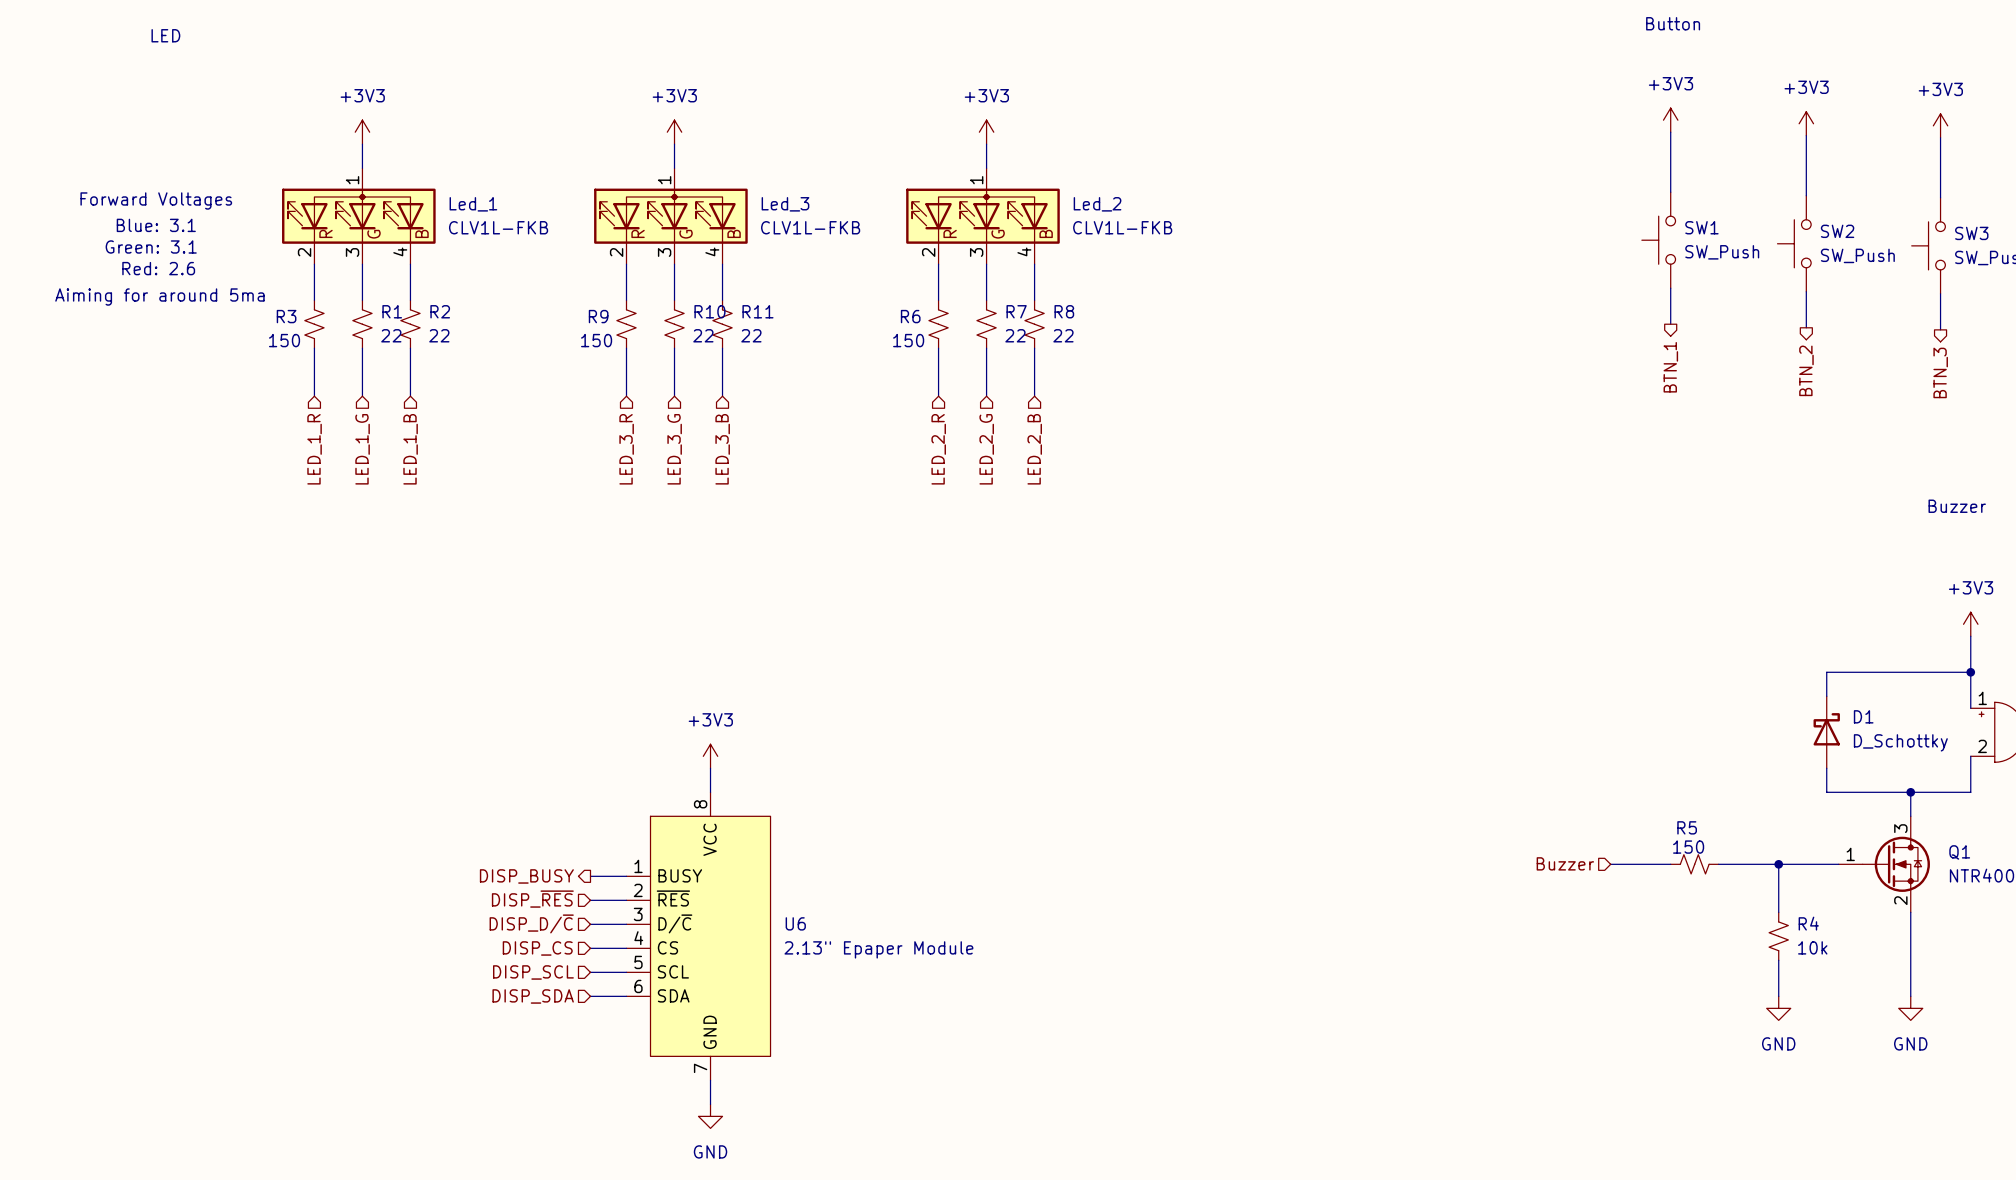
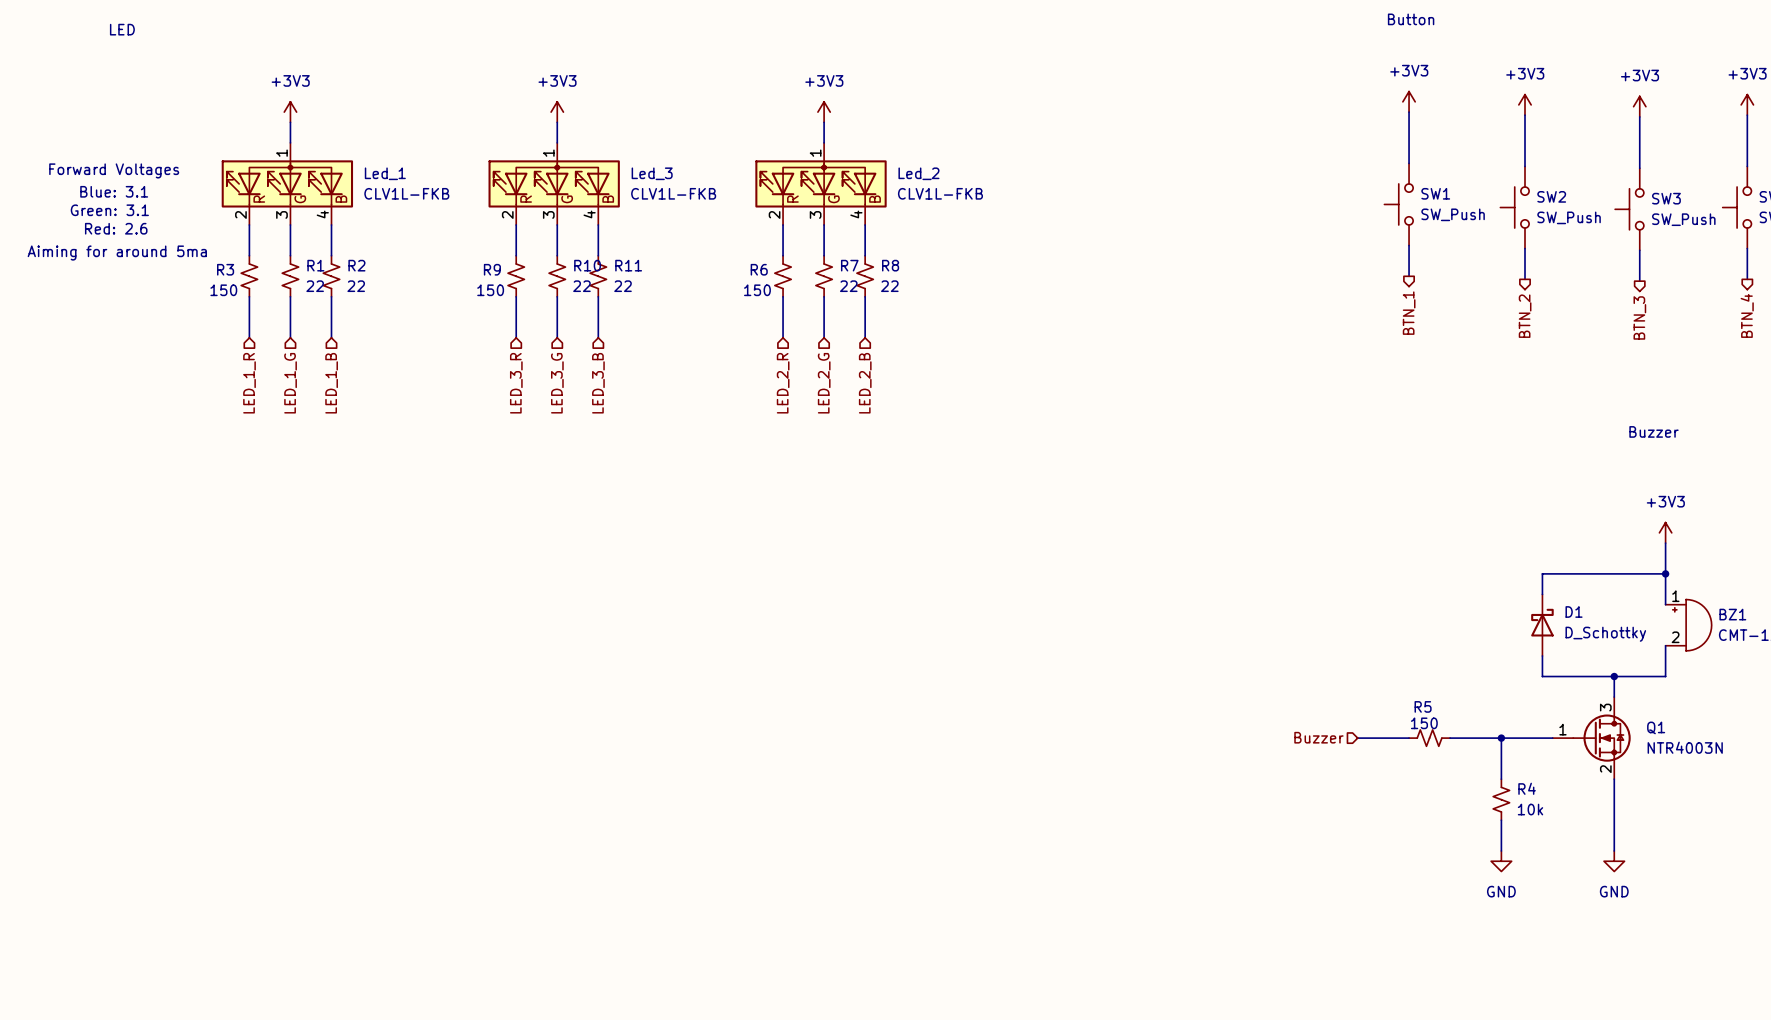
power symbol: +3V3 (710, 756) -> none
wire: (710, 768) (710, 792) -> none
hierarchical label: DISP_BUSY (526, 876) -> none
wire: (590, 876) (626, 876) -> none
hierarchical label: DISP_~{RES} (532, 899) -> none
wire: (590, 900) (626, 900) -> none
hierarchical label: DISP_D/~{C} (531, 923) -> none
wire: (590, 924) (626, 924) -> none
U6: 2.13" Epaper Module (698, 936) -> none
hierarchical label: DISP_CS (537, 948) -> none
wire: (590, 948) (626, 948) -> none
hierarchical label: DISP_SCL (533, 972) -> none
wire: (590, 972) (626, 972) -> none
hierarchical label: DISP_SDA (533, 996) -> none
wire: (590, 996) (626, 996) -> none
wire: (710, 1080) (710, 1104) -> none
power symbol: GND (710, 1116) -> none

